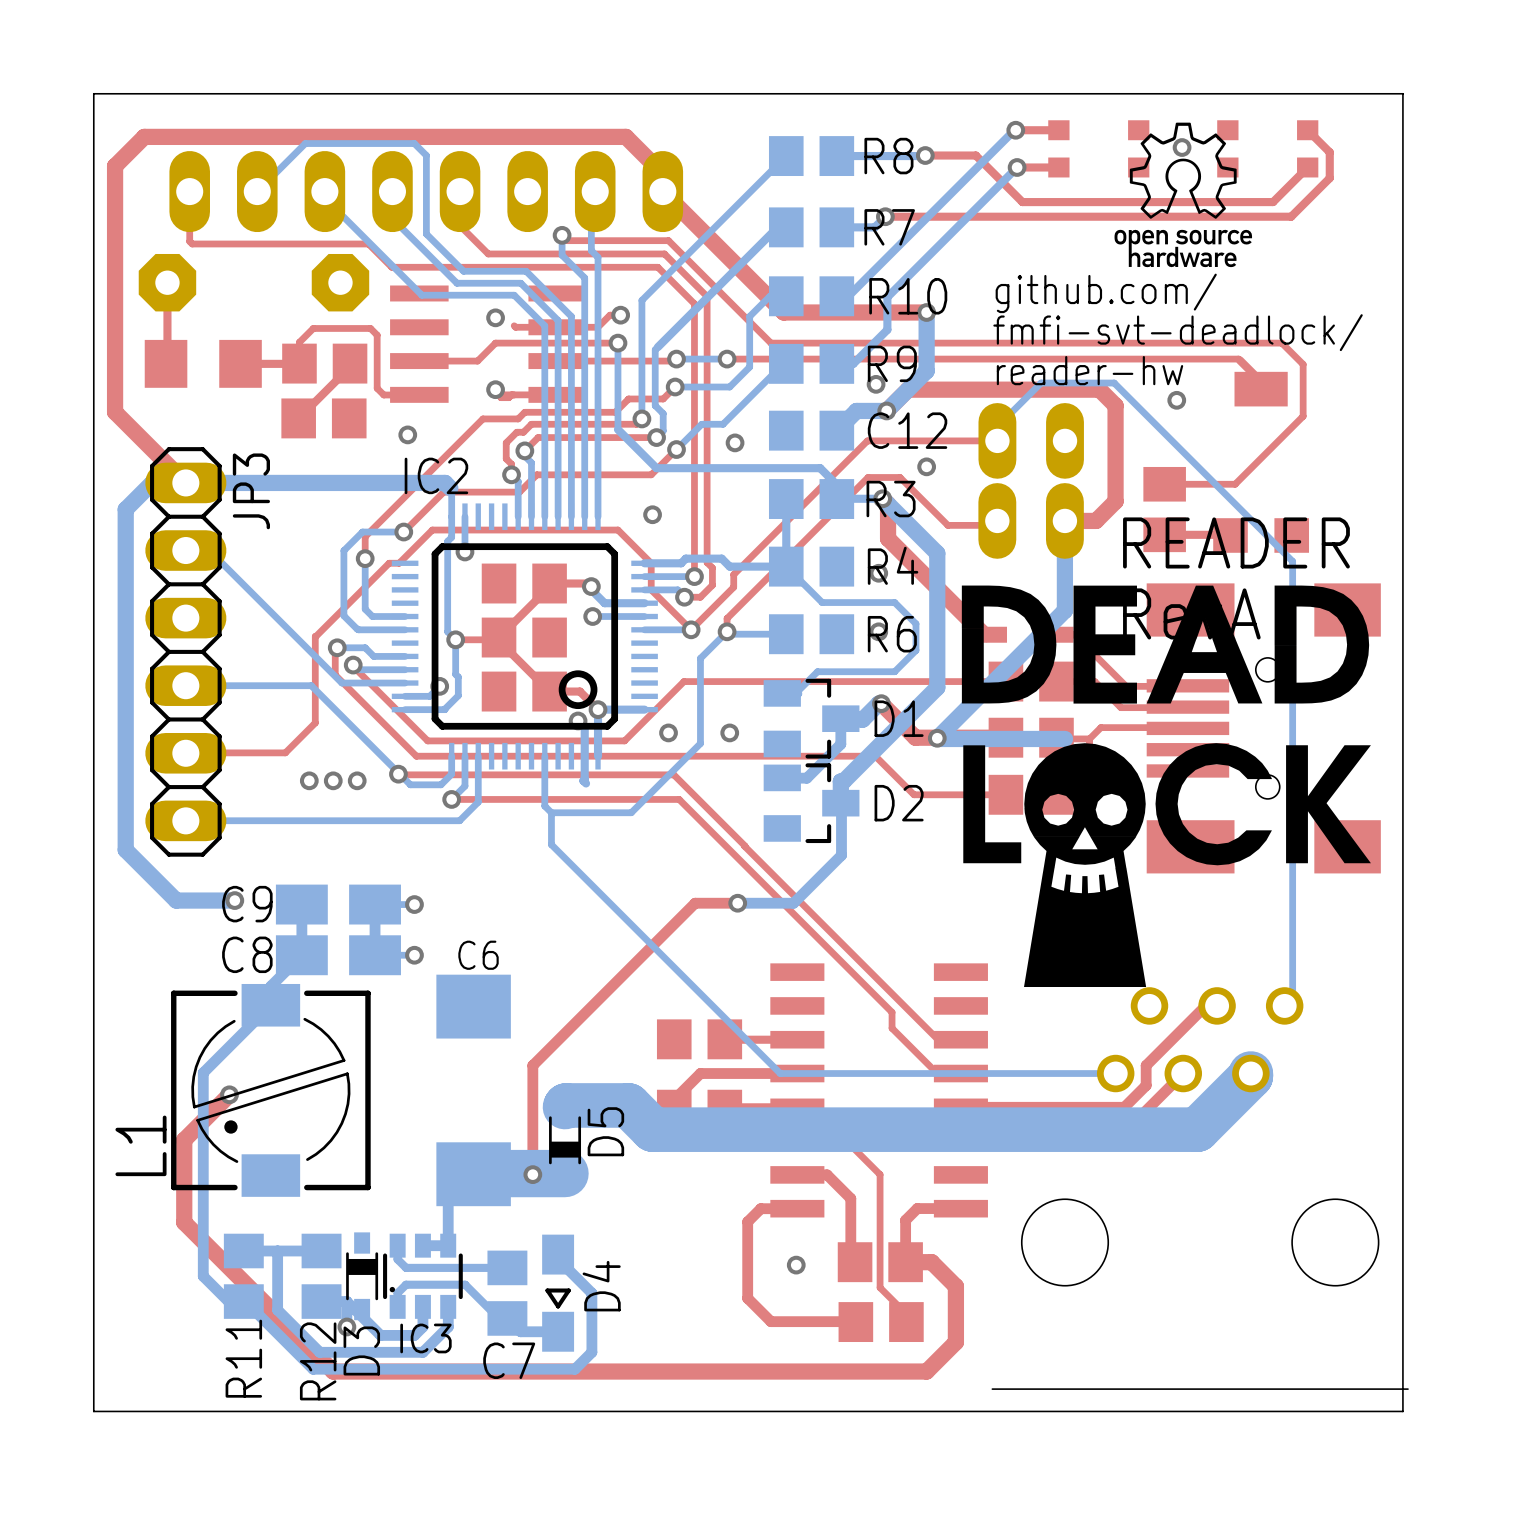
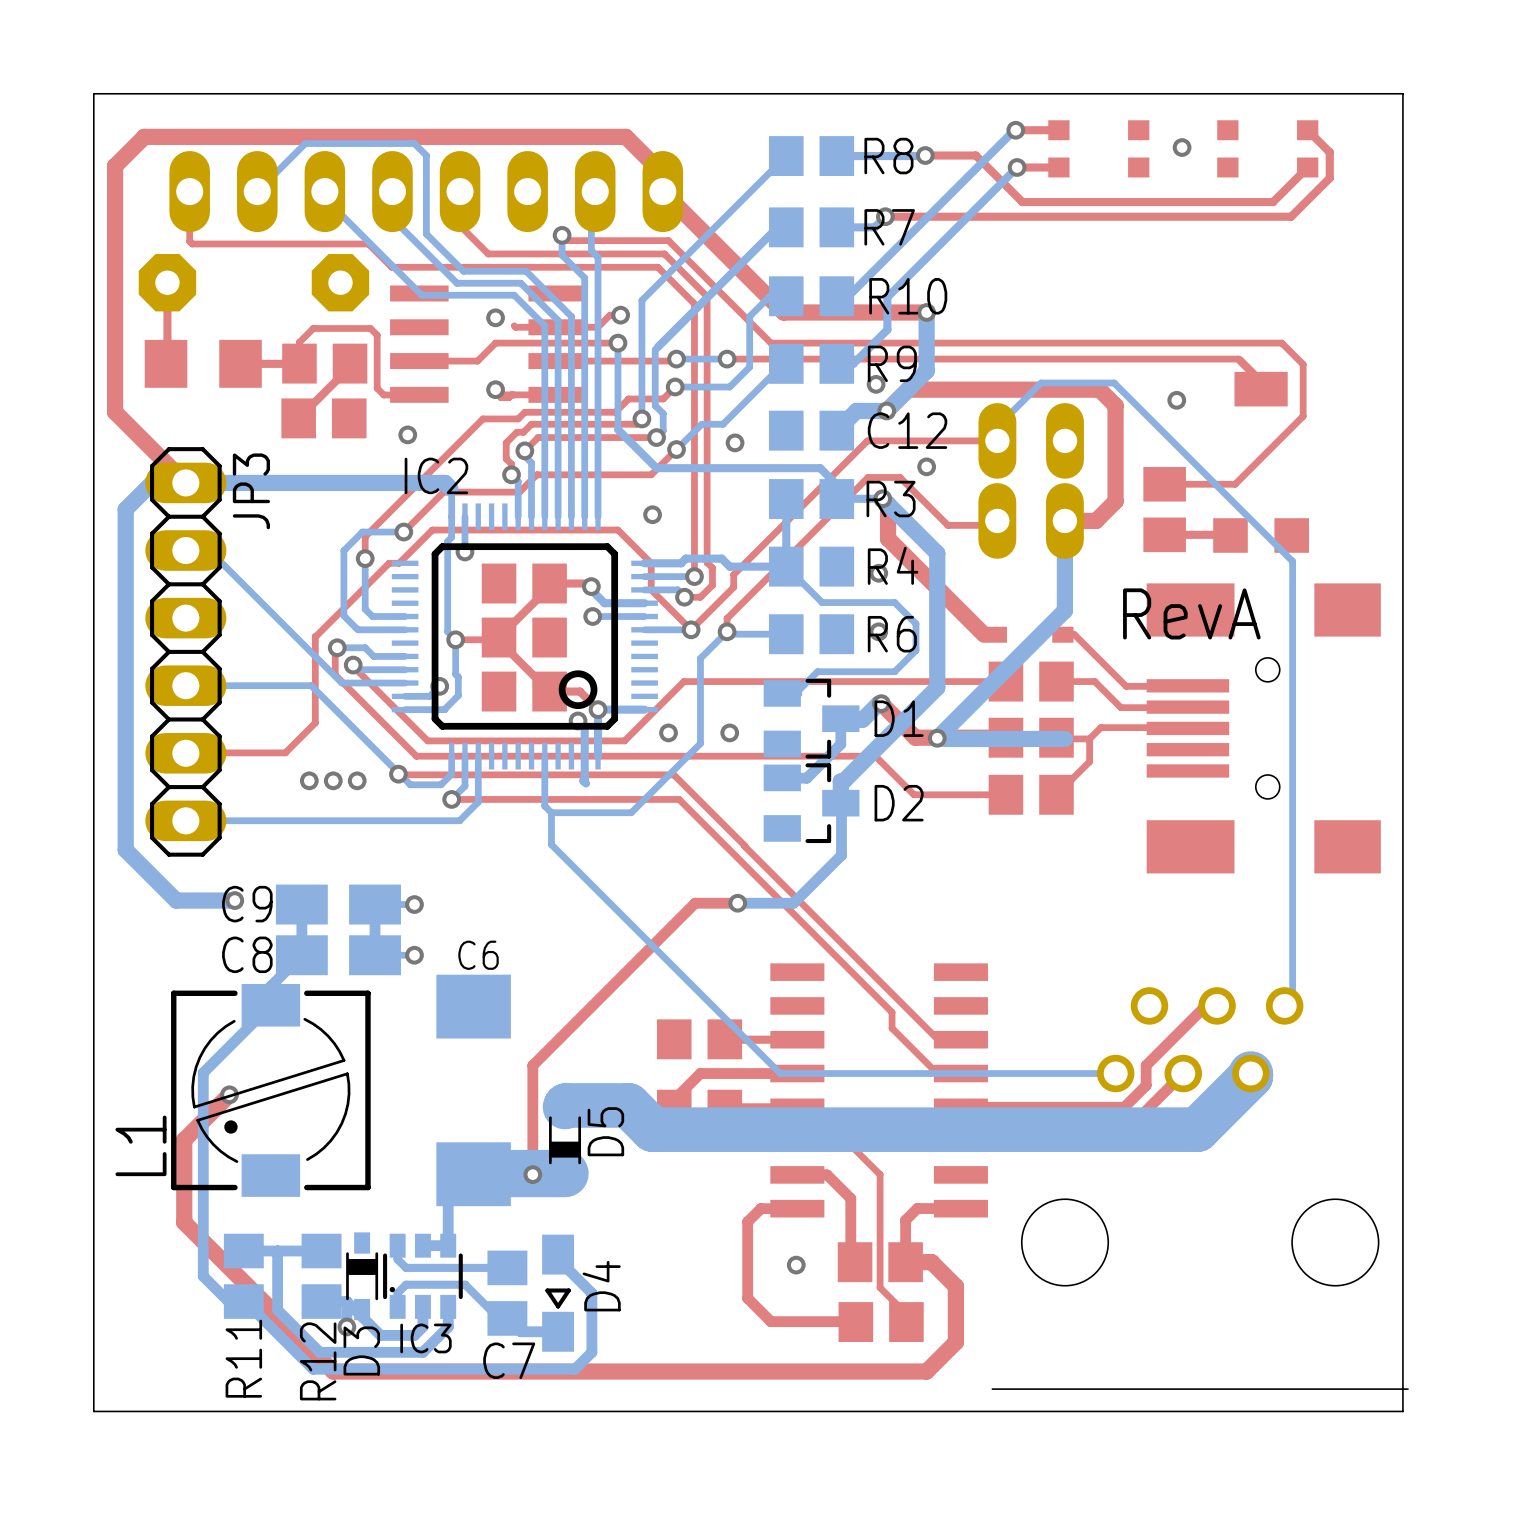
drawing: [1114, 122, 1253, 268] -> none
text: github.com/ (1106, 293) -> none
text: fmfi-svt-deadlock/ (1178, 332) -> none
text: reader-hw (1089, 370) -> none
text: READER (1236, 542) -> none
drawing: [961, 585, 1370, 704] -> none
drawing: [963, 743, 1371, 988] -> none

